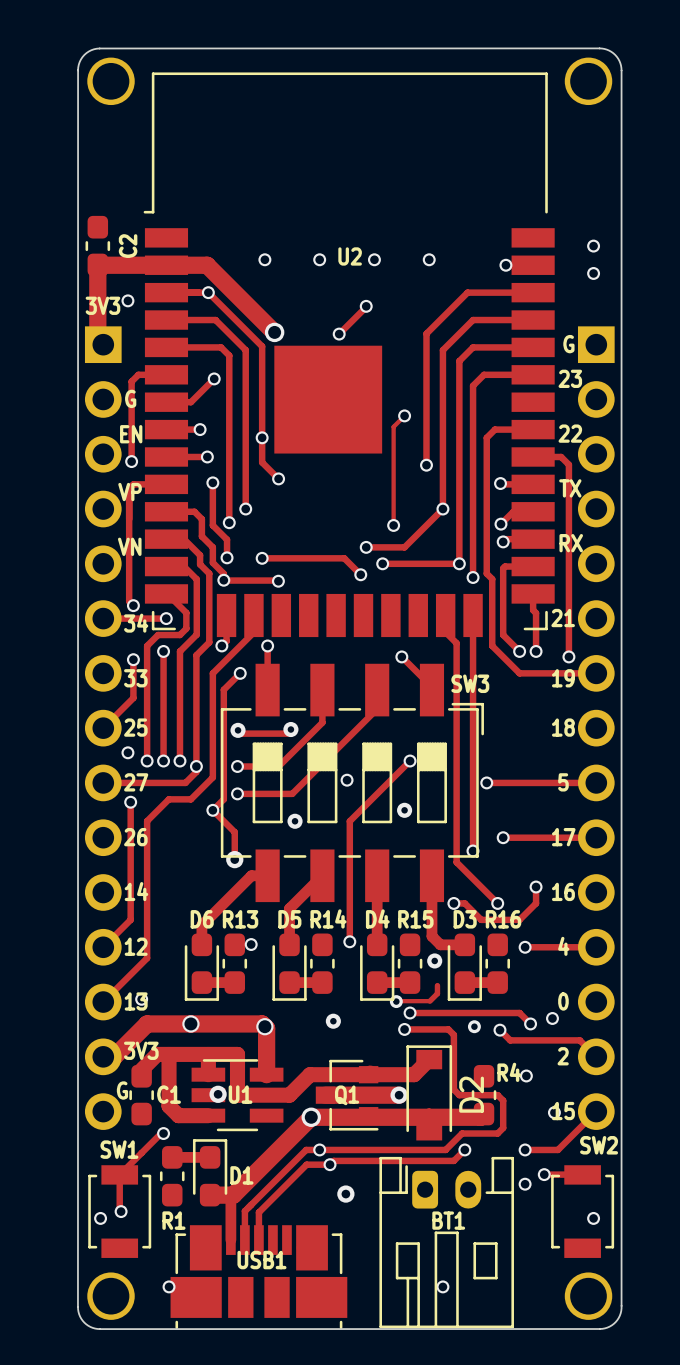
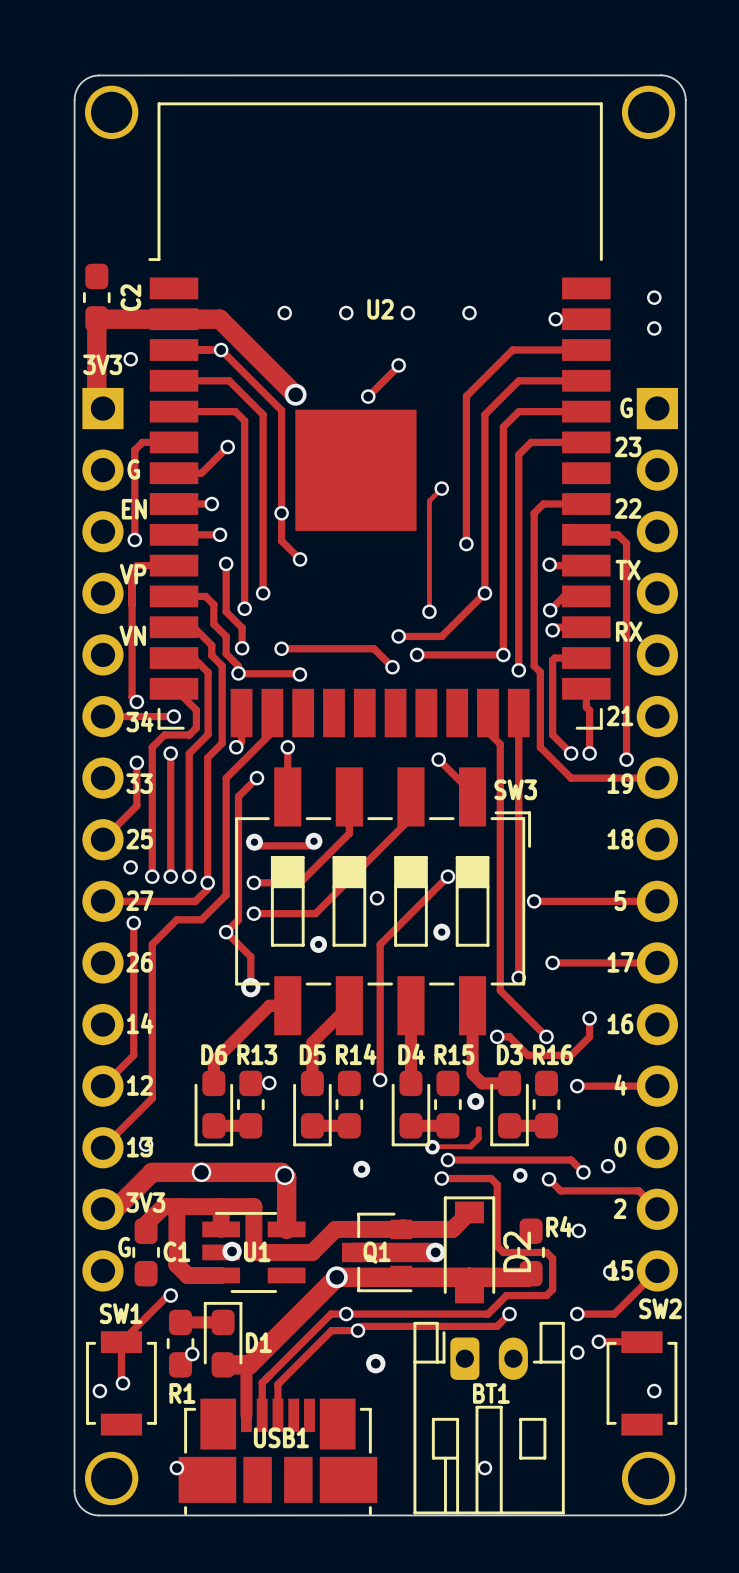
via: none -> (192, 1354)

